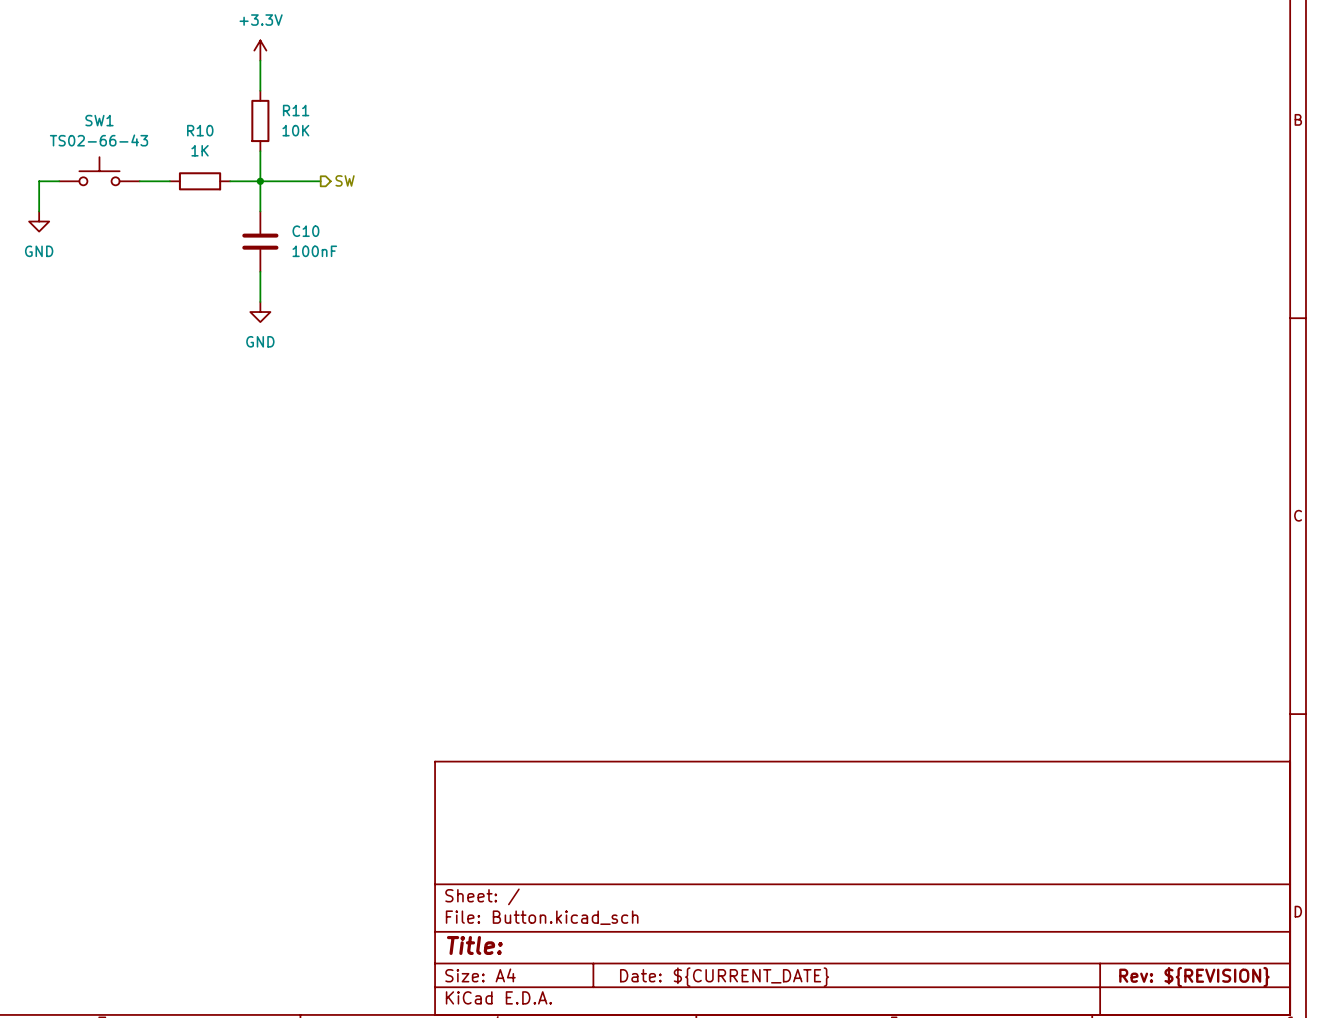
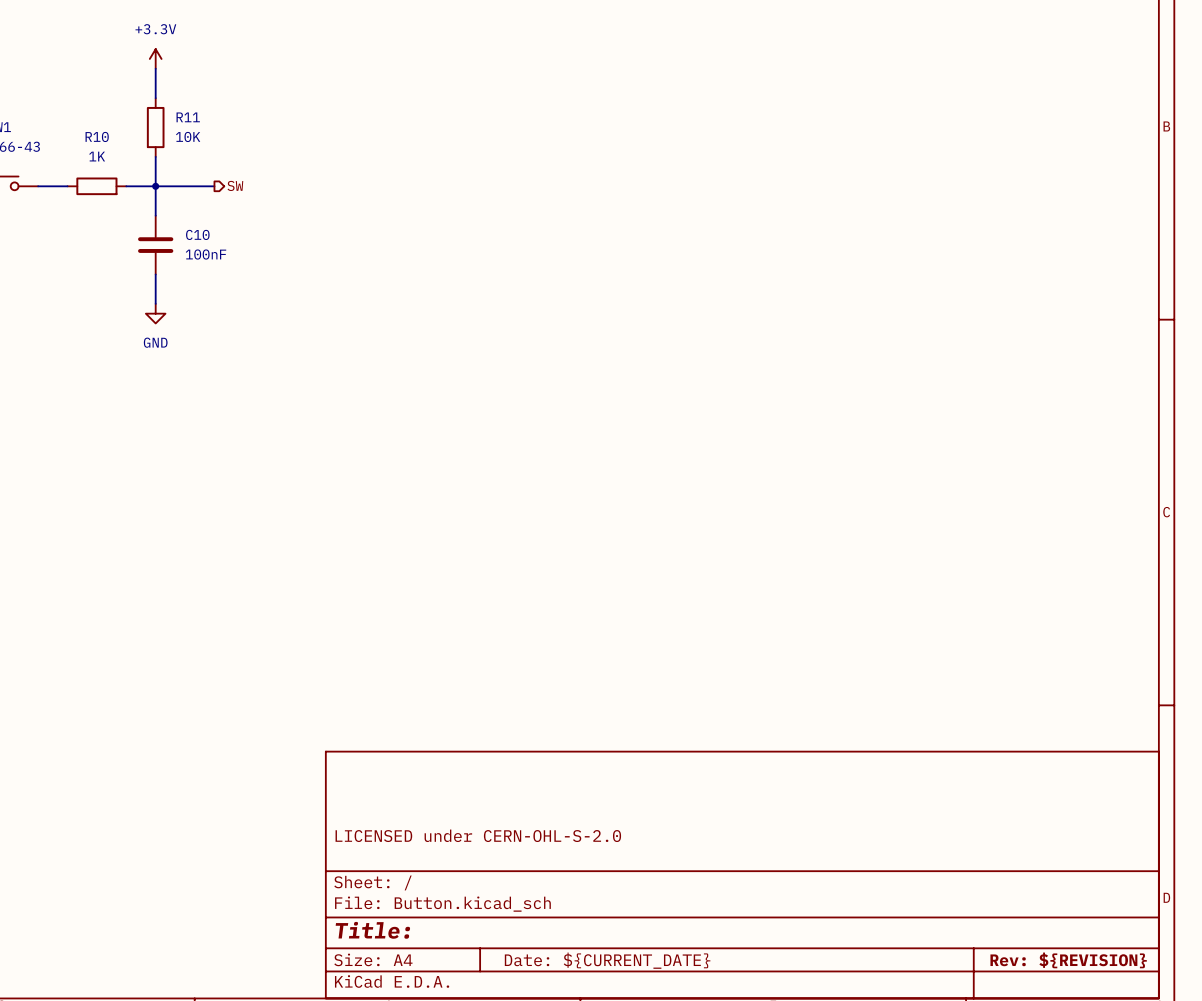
title block: none -> LICENSED under CERN-OHL-S-2.0 (478, 835)

